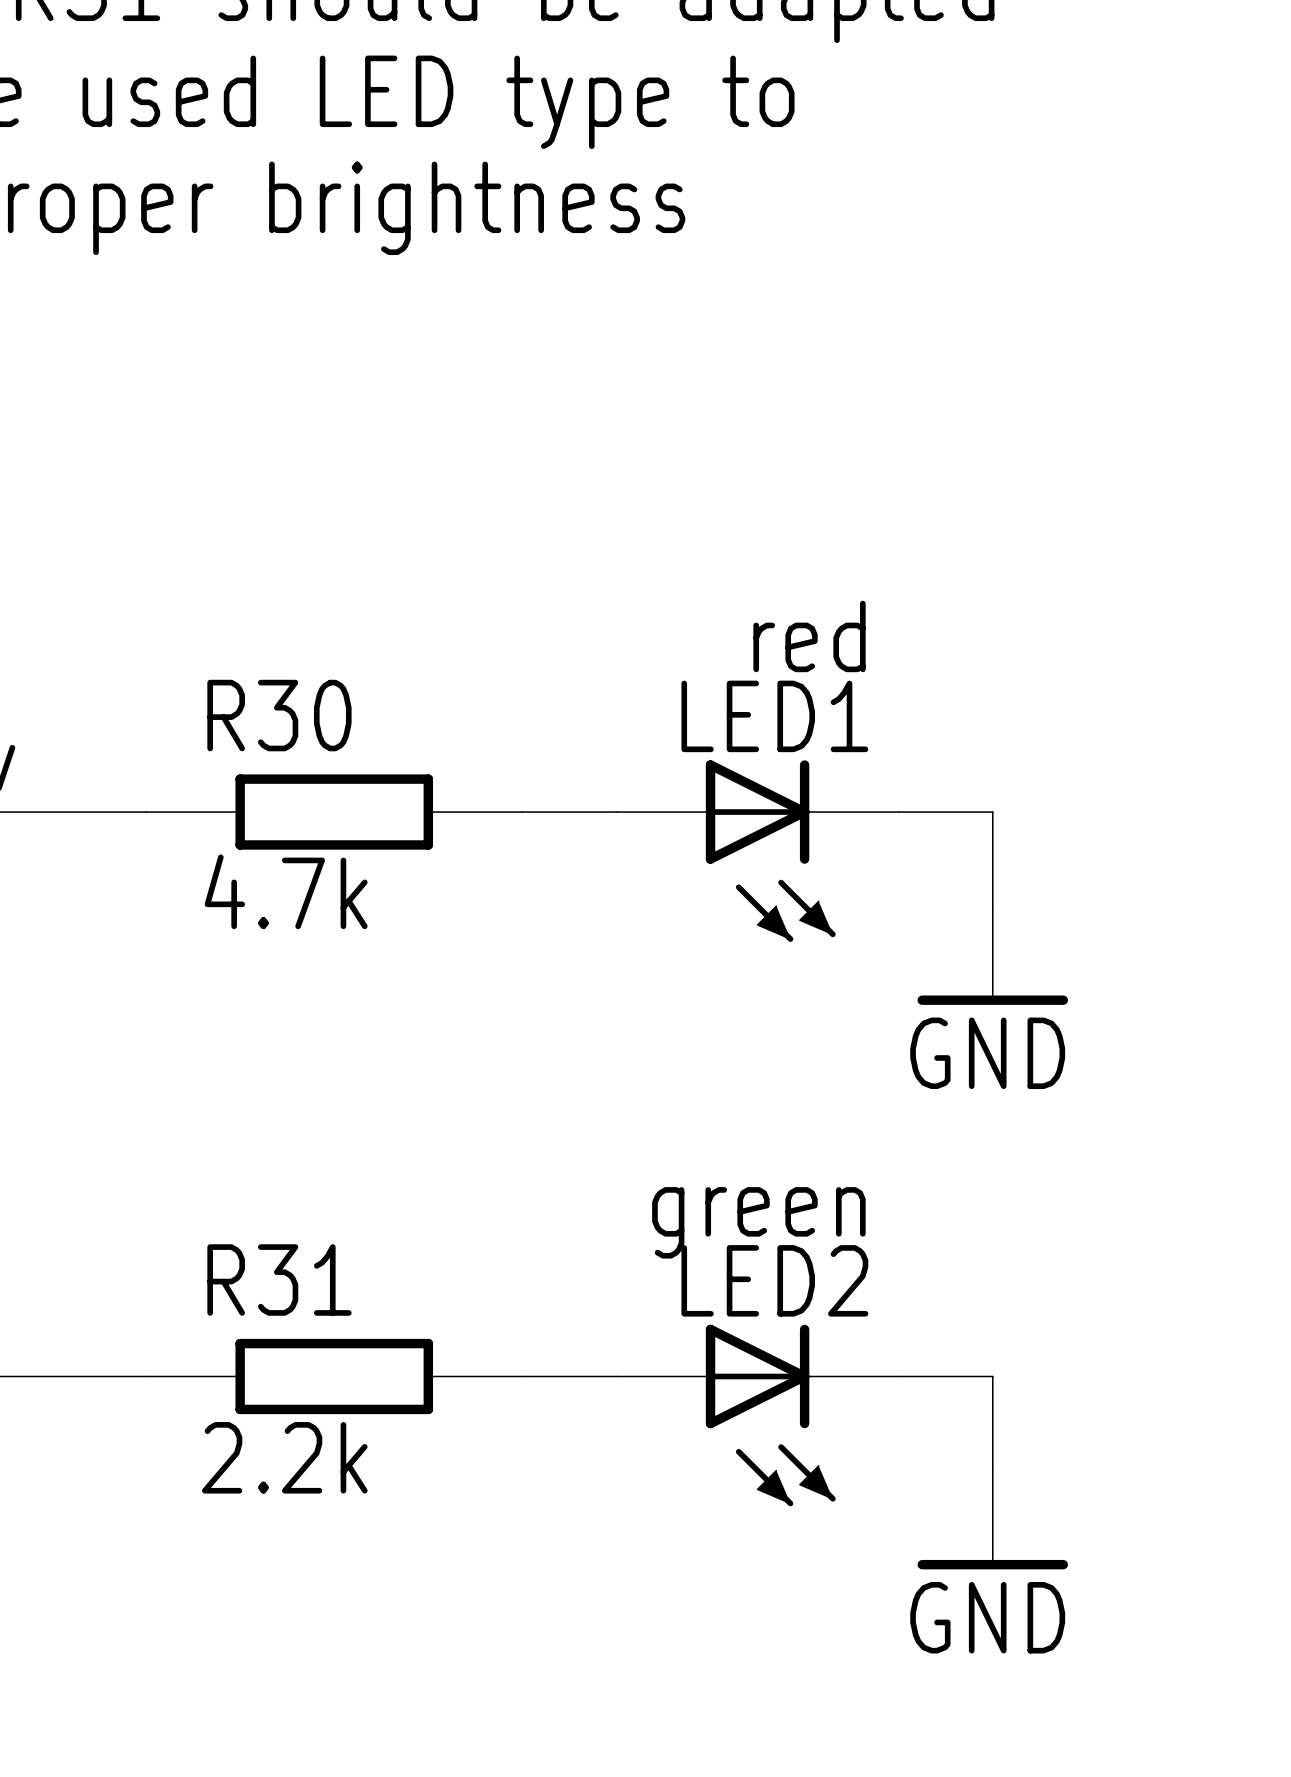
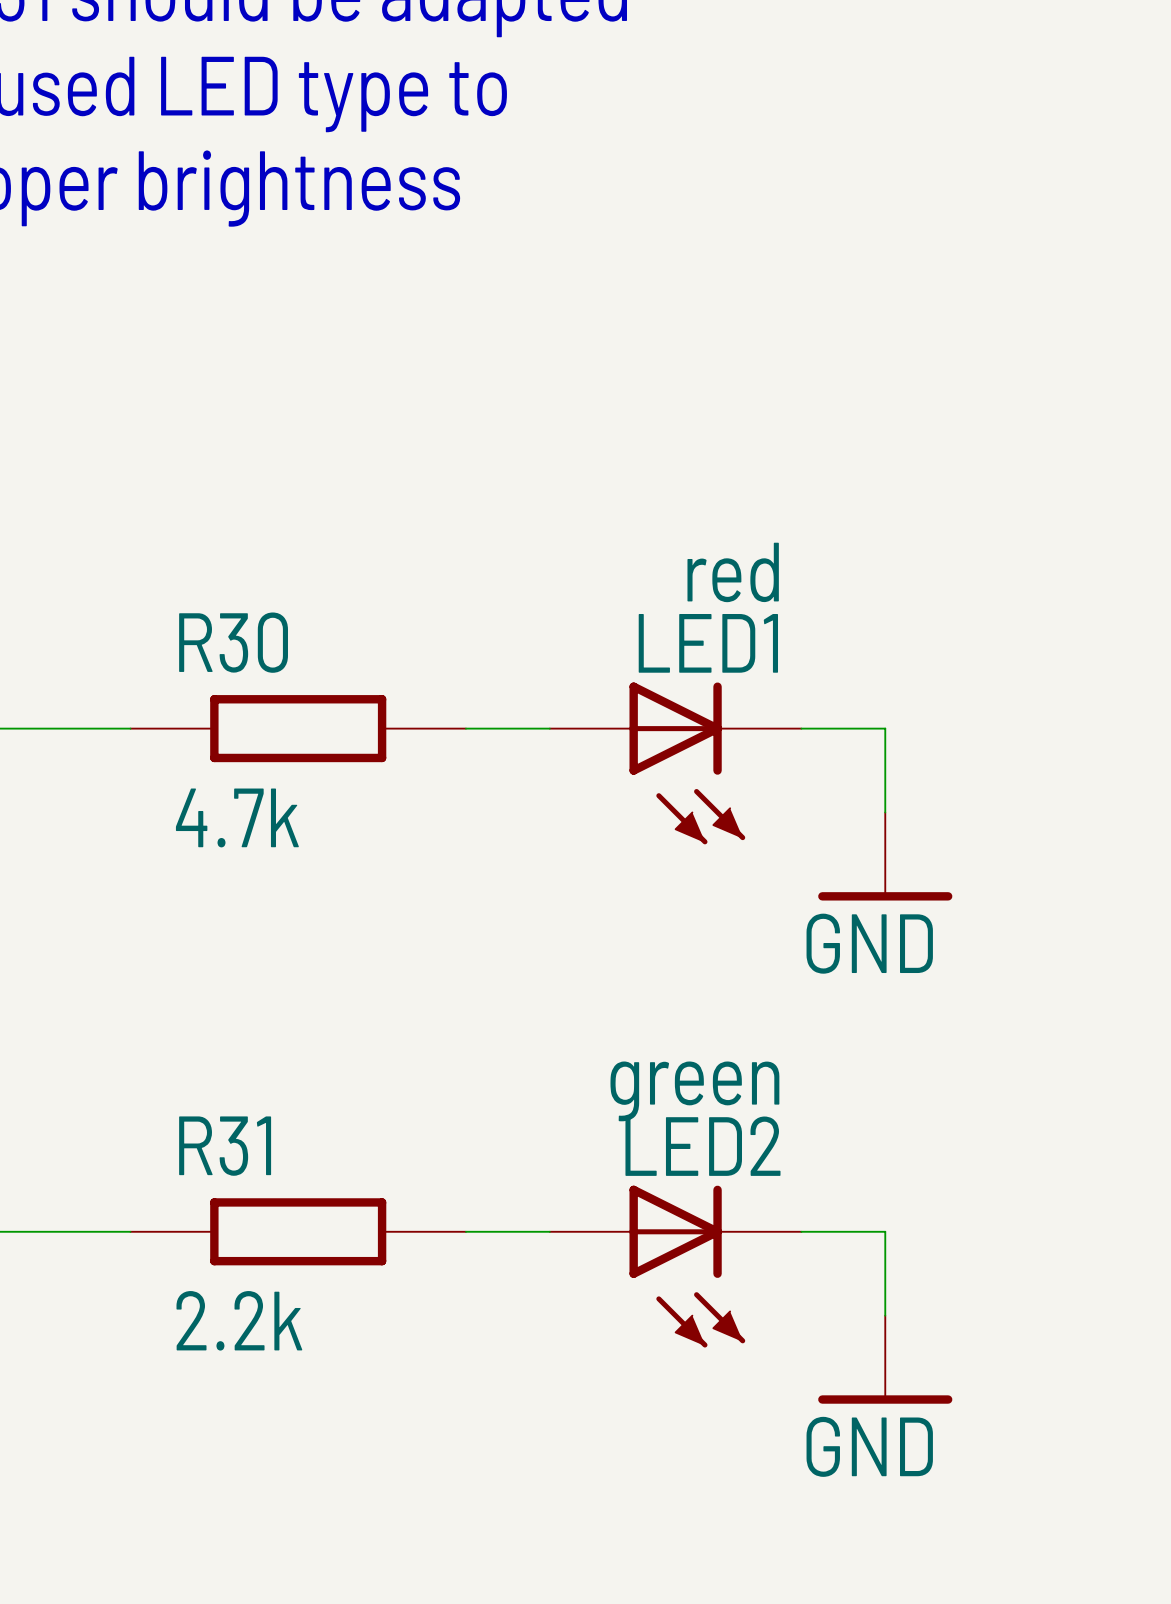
R30 value position: 4.7k (286, 891) -> 4.7k (237, 817)
R31 value position: 2.2k (284, 1457) -> 2.2k (239, 1320)

